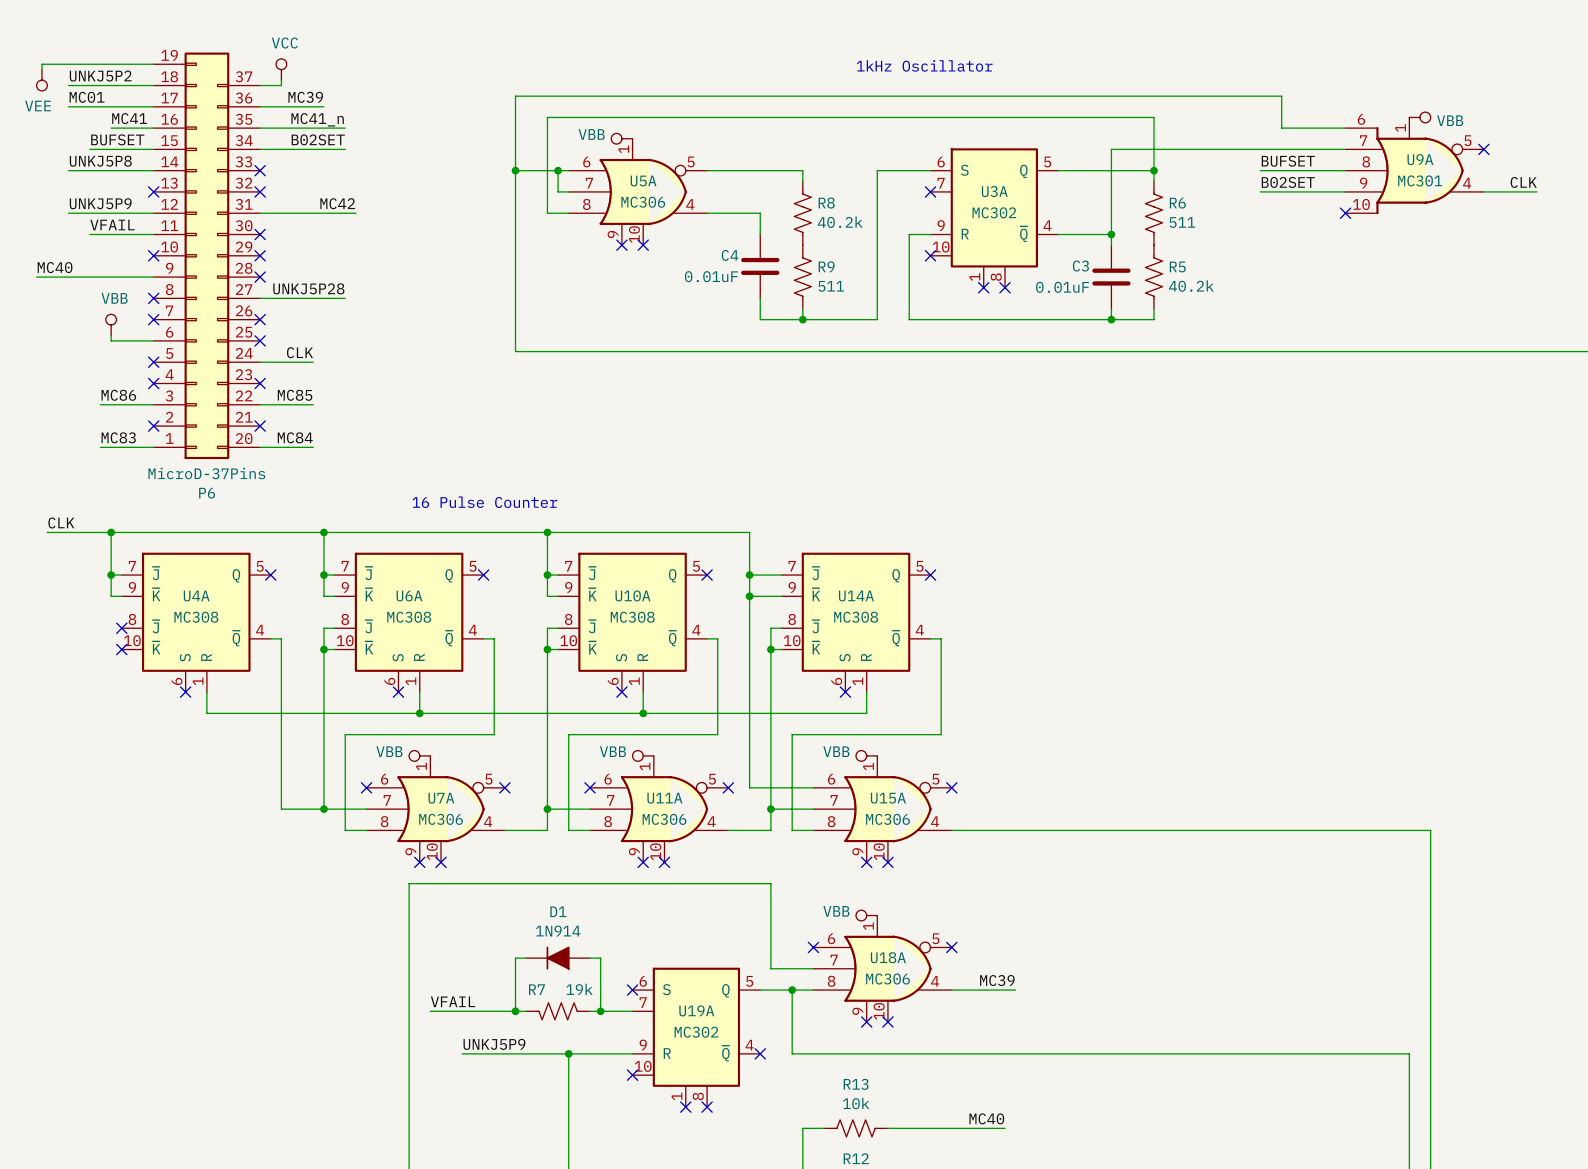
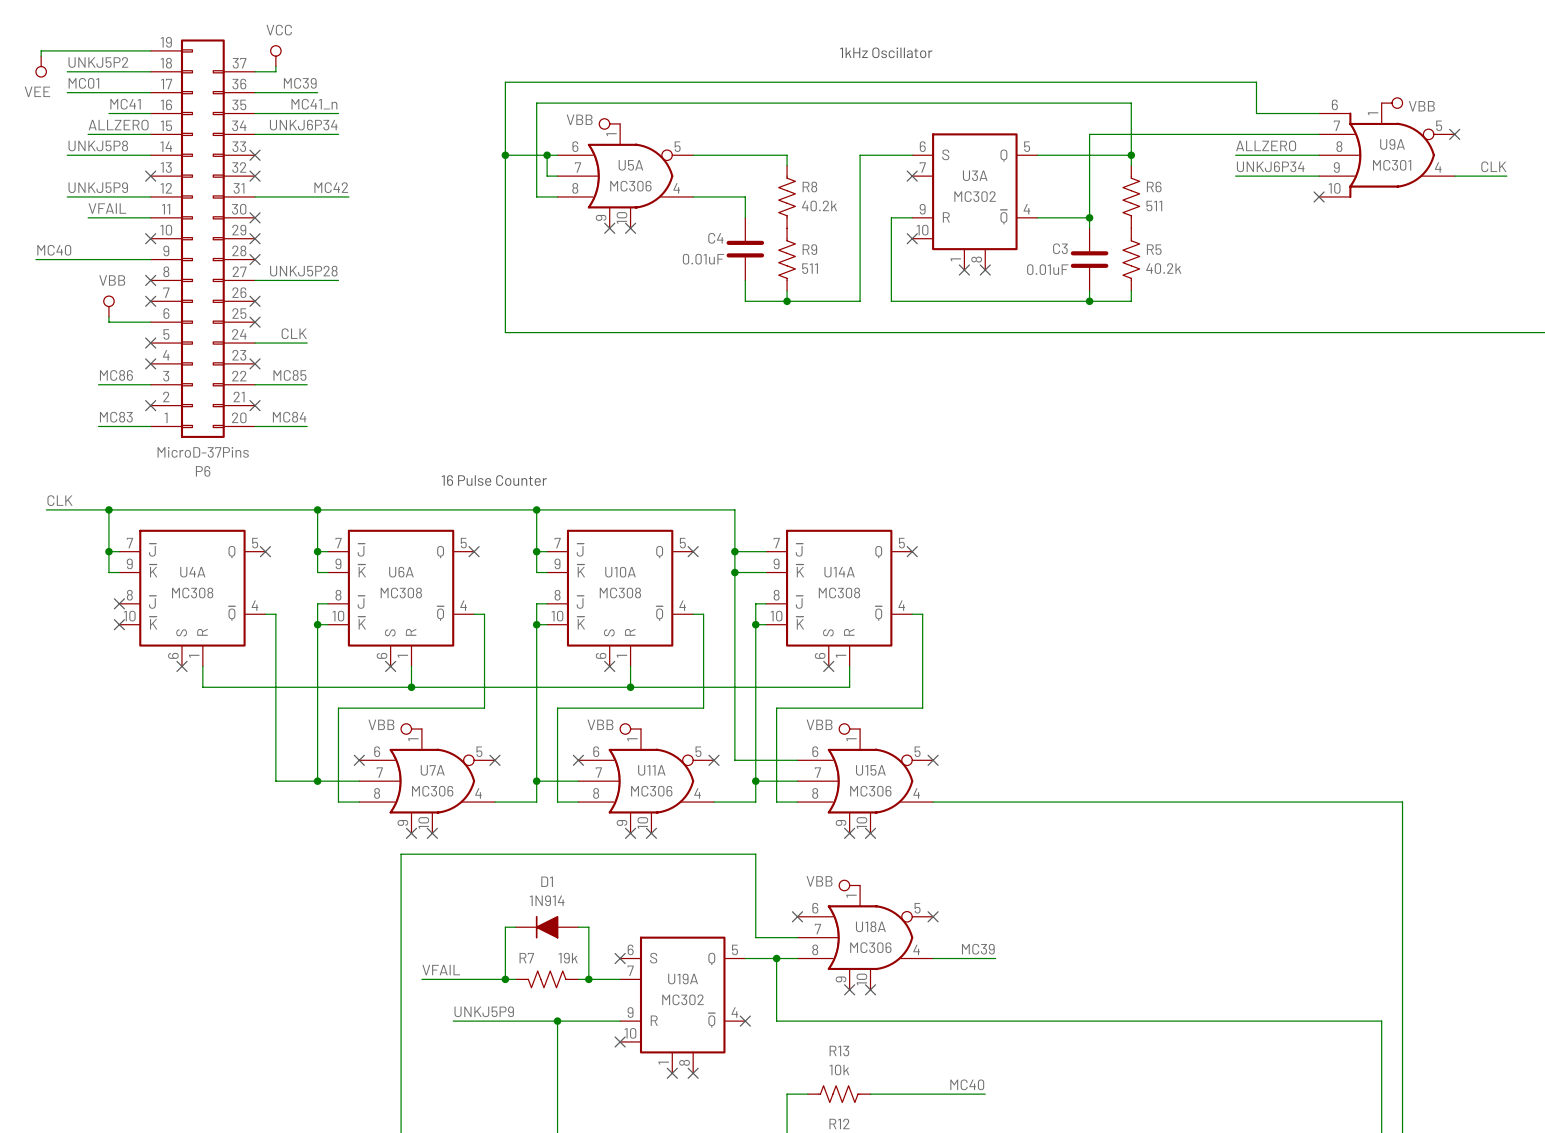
label: BUFSET (117, 139) -> ALLZERO (118, 125)
label: B02SET (318, 139) -> UNKJ6P34 (303, 125)
label: BUFSET (1288, 161) -> ALLZERO (1266, 145)
label: B02SET (1288, 182) -> UNKJ6P34 (1270, 166)

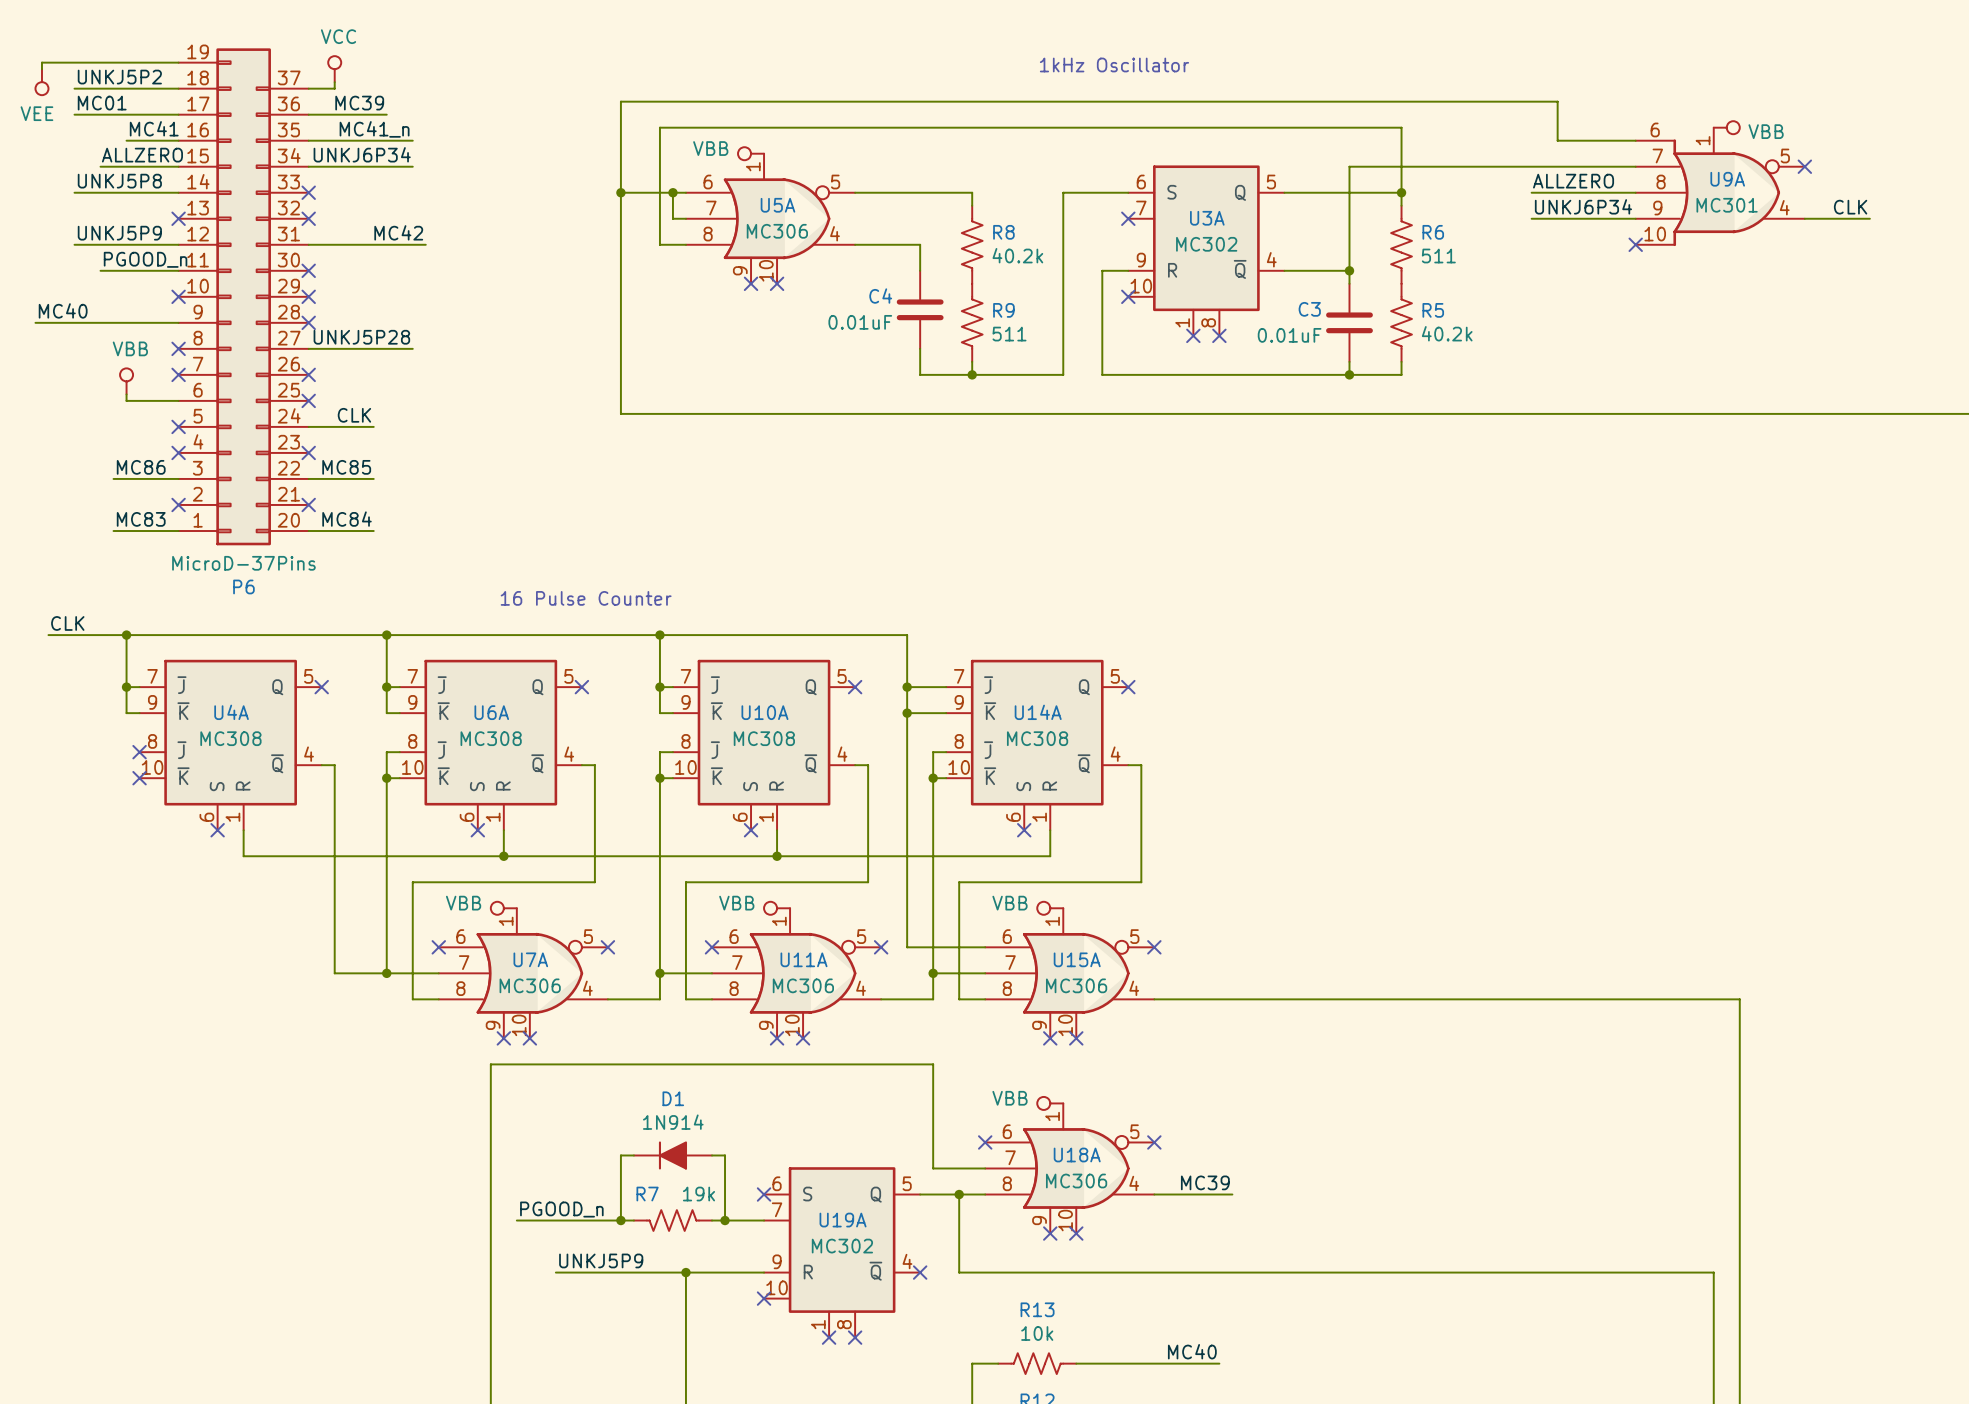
label: VFAIL (107, 208) -> PGOOD_n (145, 259)
label: VFAIL (441, 970) -> PGOOD_n (561, 1209)

